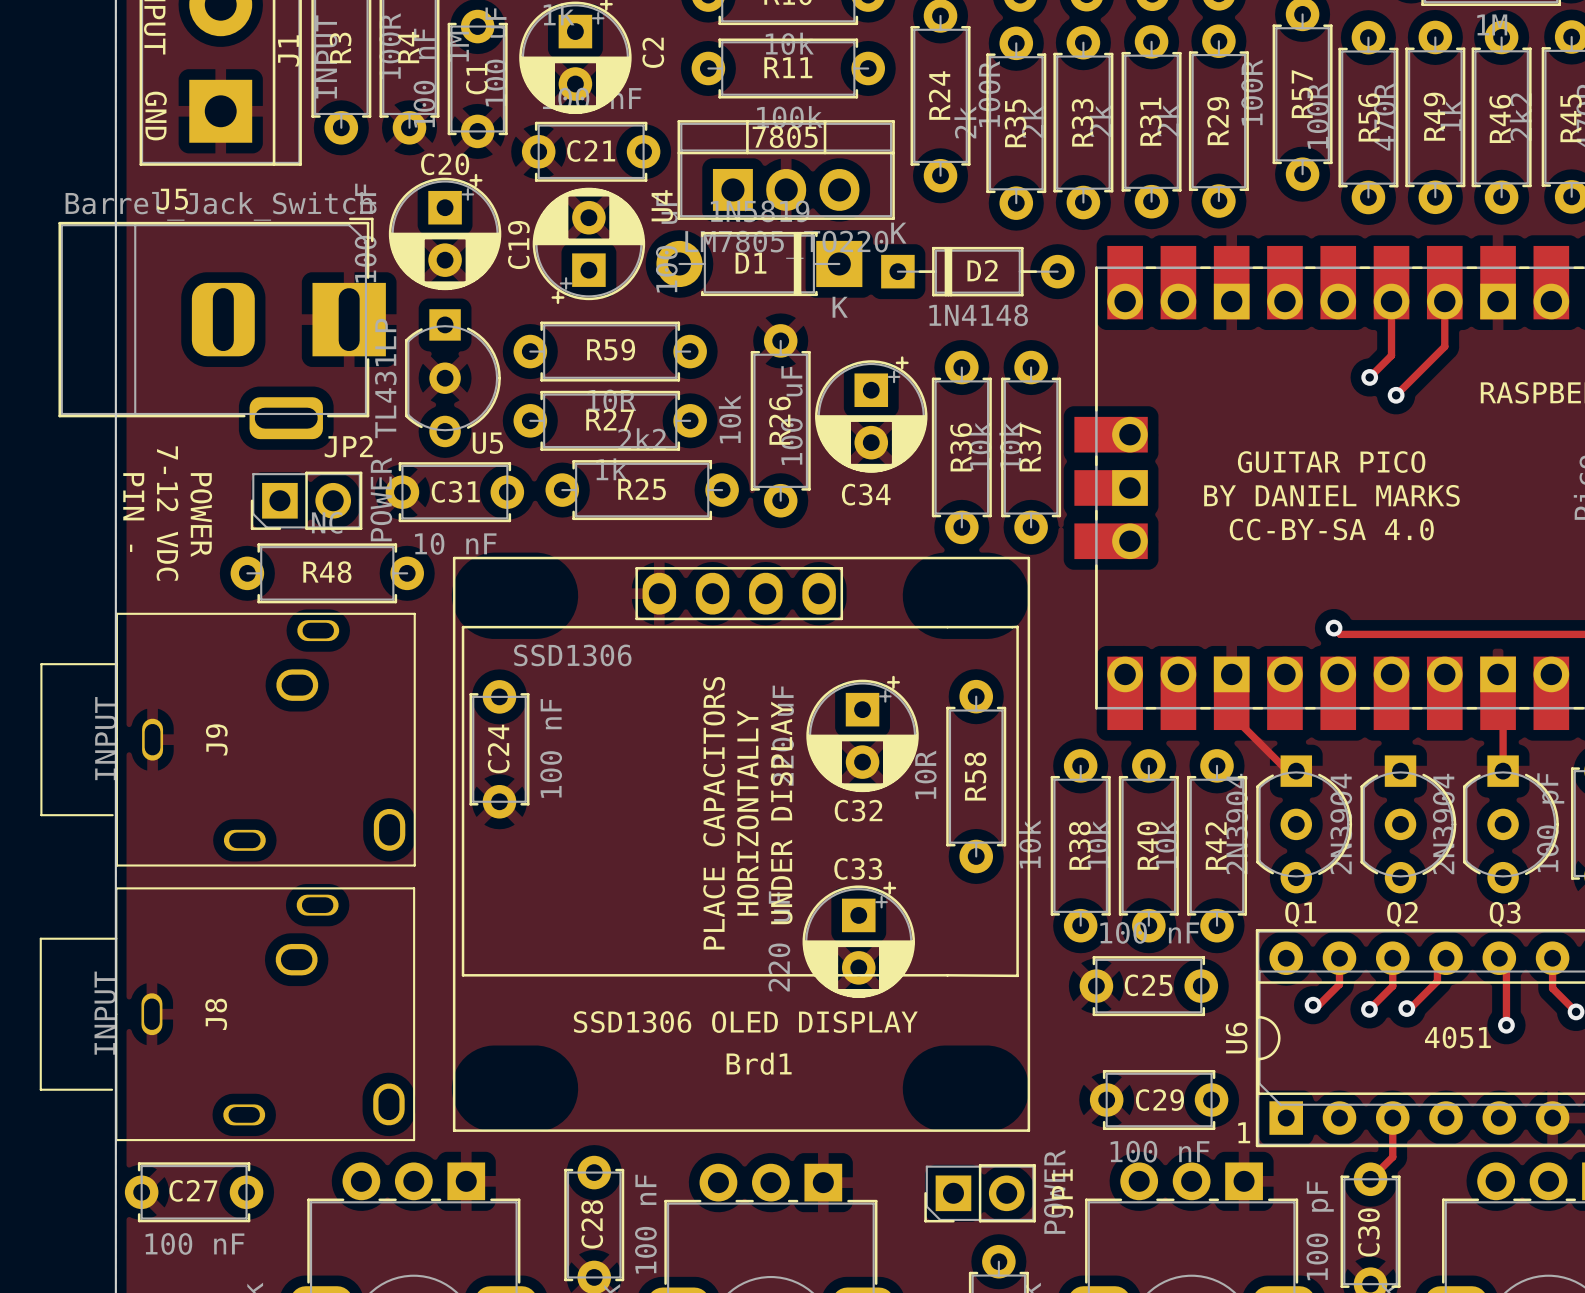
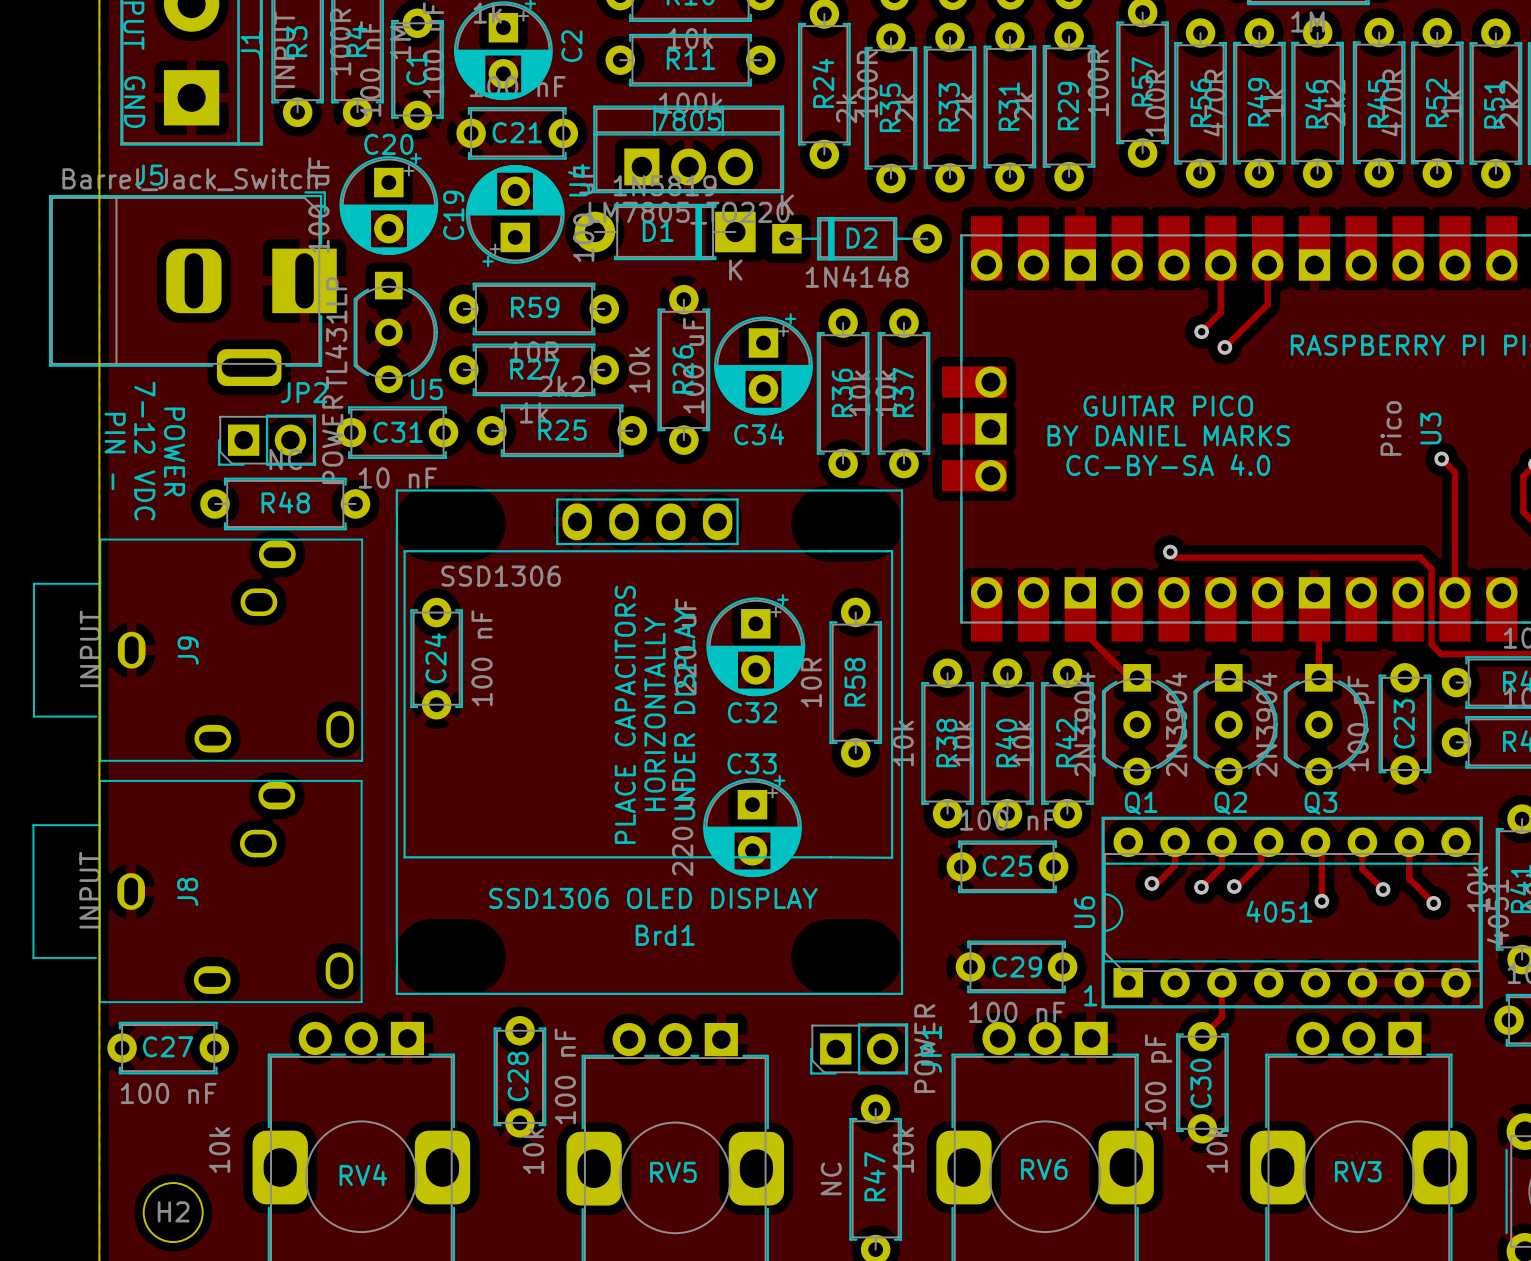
J9 footprint: [40, 612, 416, 867] -> [33, 538, 364, 762]
J8 footprint: [39, 887, 416, 1142] -> [32, 779, 363, 1004]

